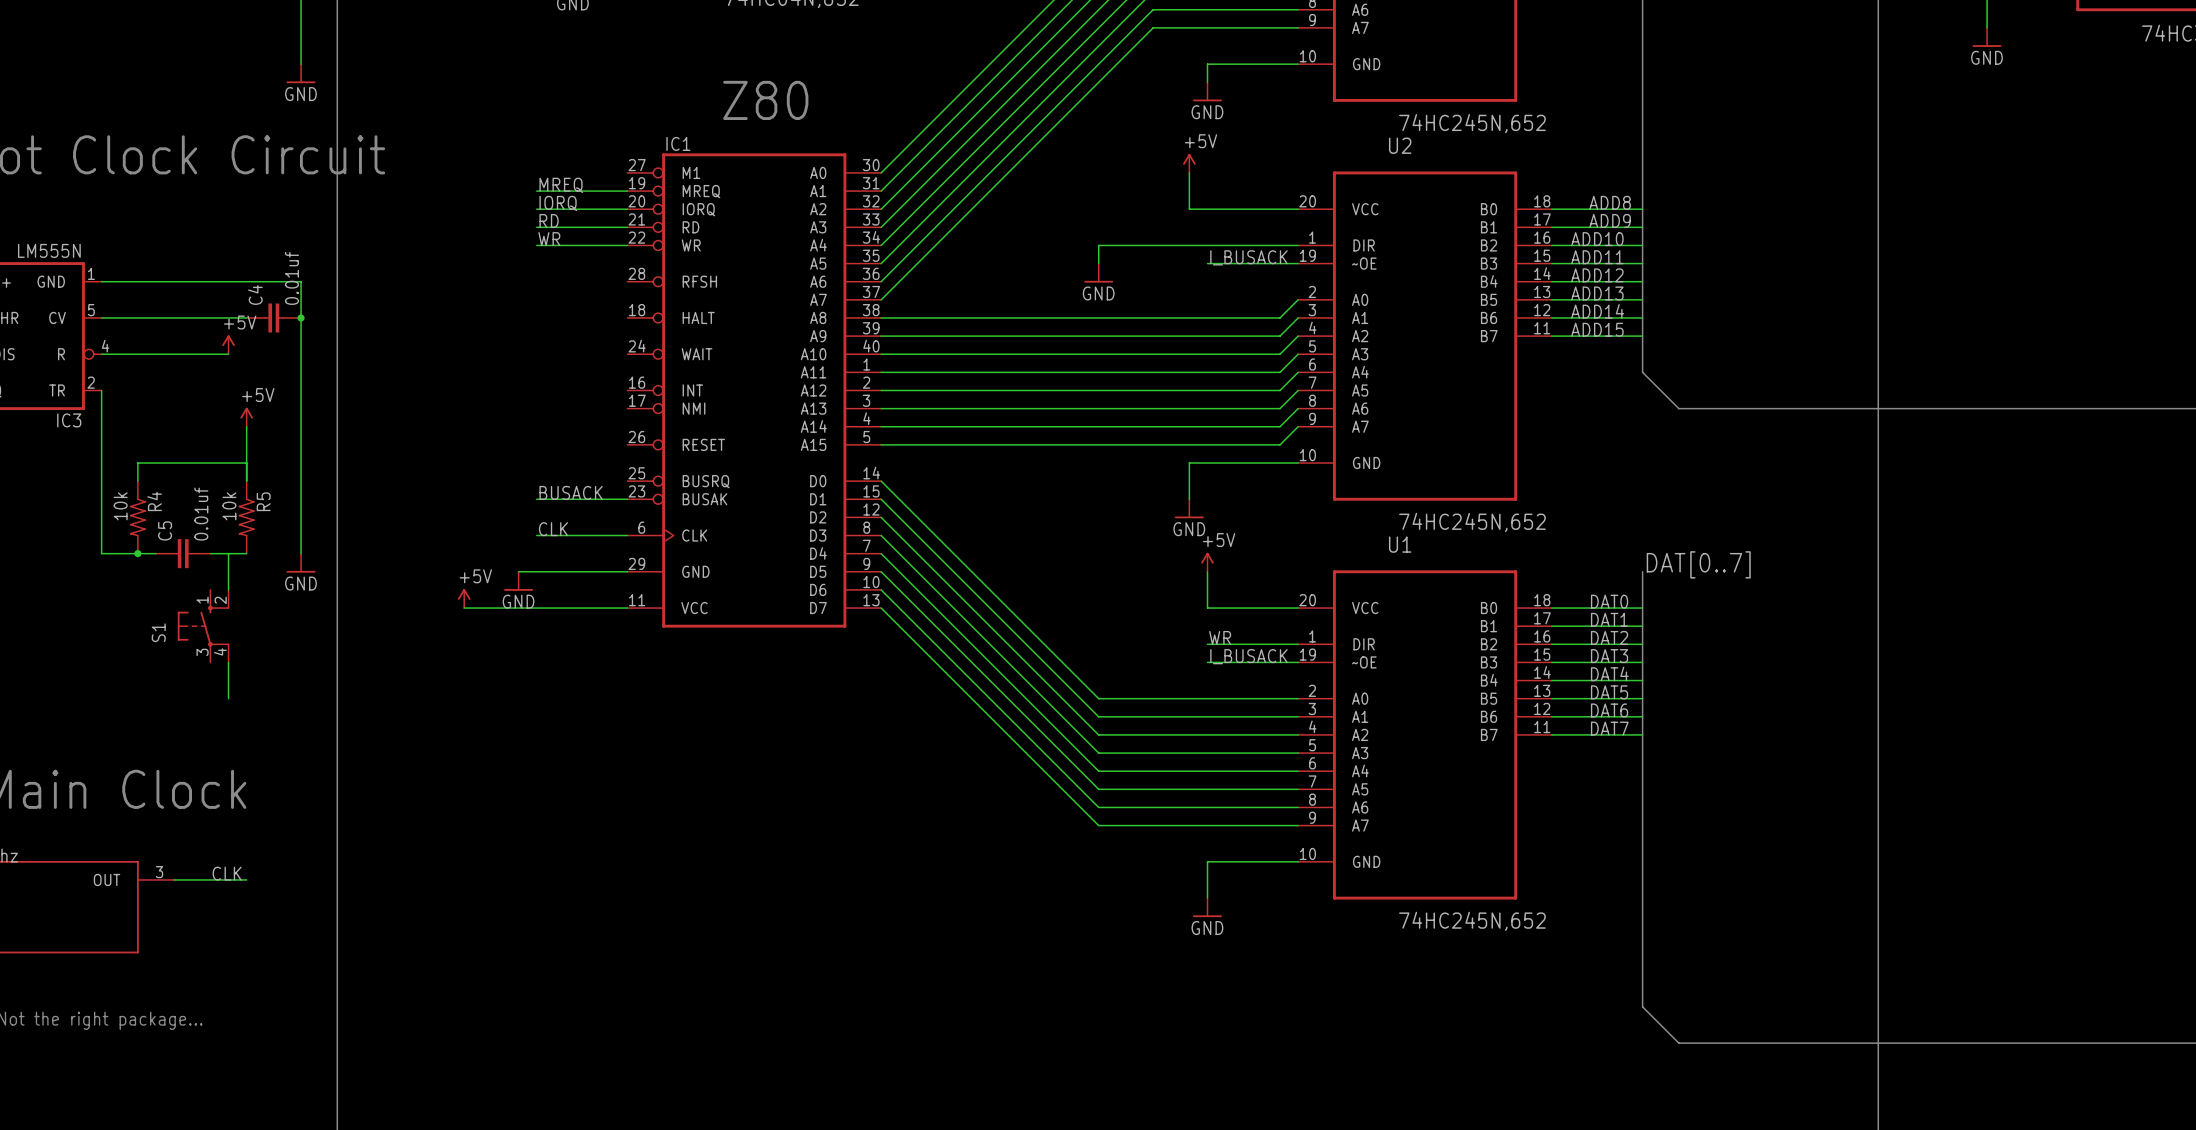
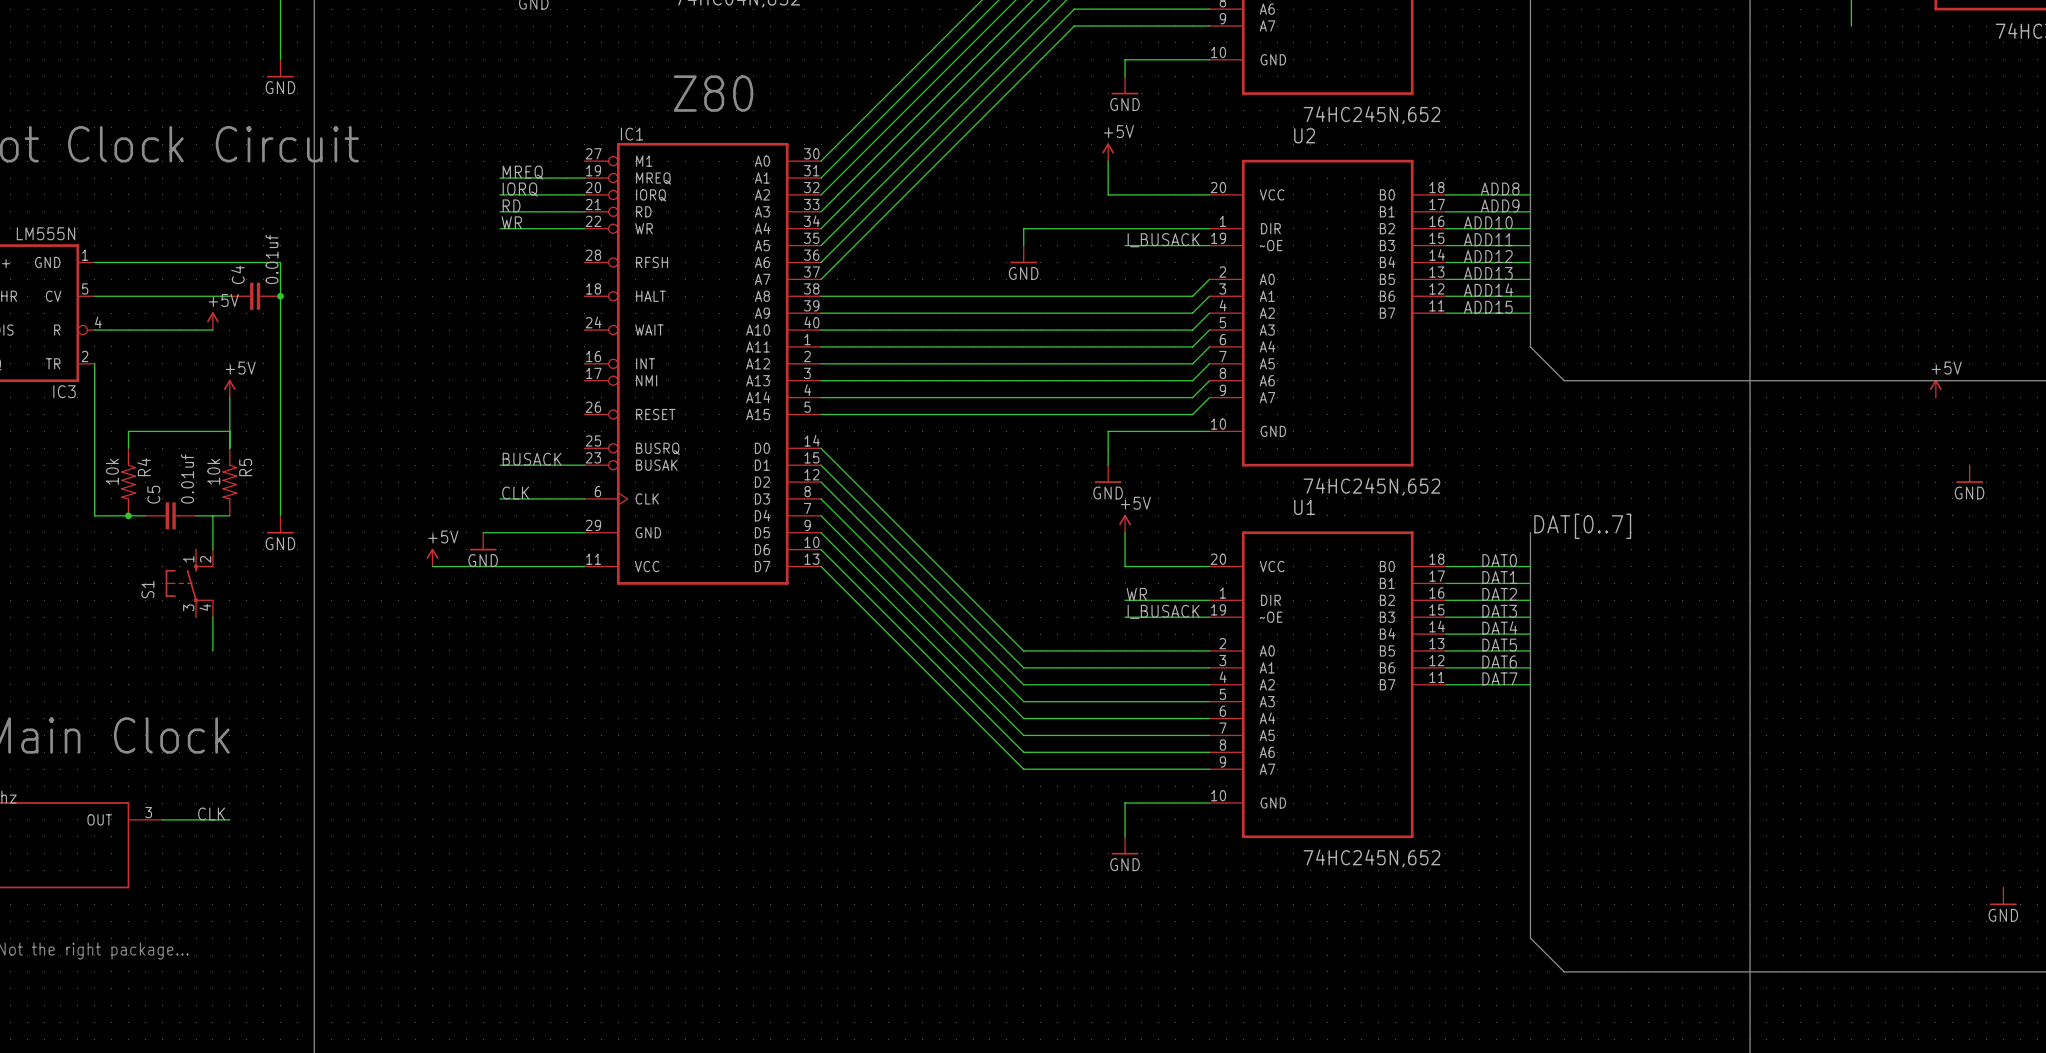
power symbol: GND (1987, 37) -> none
power symbol: none -> +5V (1935, 388)
power symbol: none -> GND (1969, 474)
power symbol: none -> GND (2003, 896)

